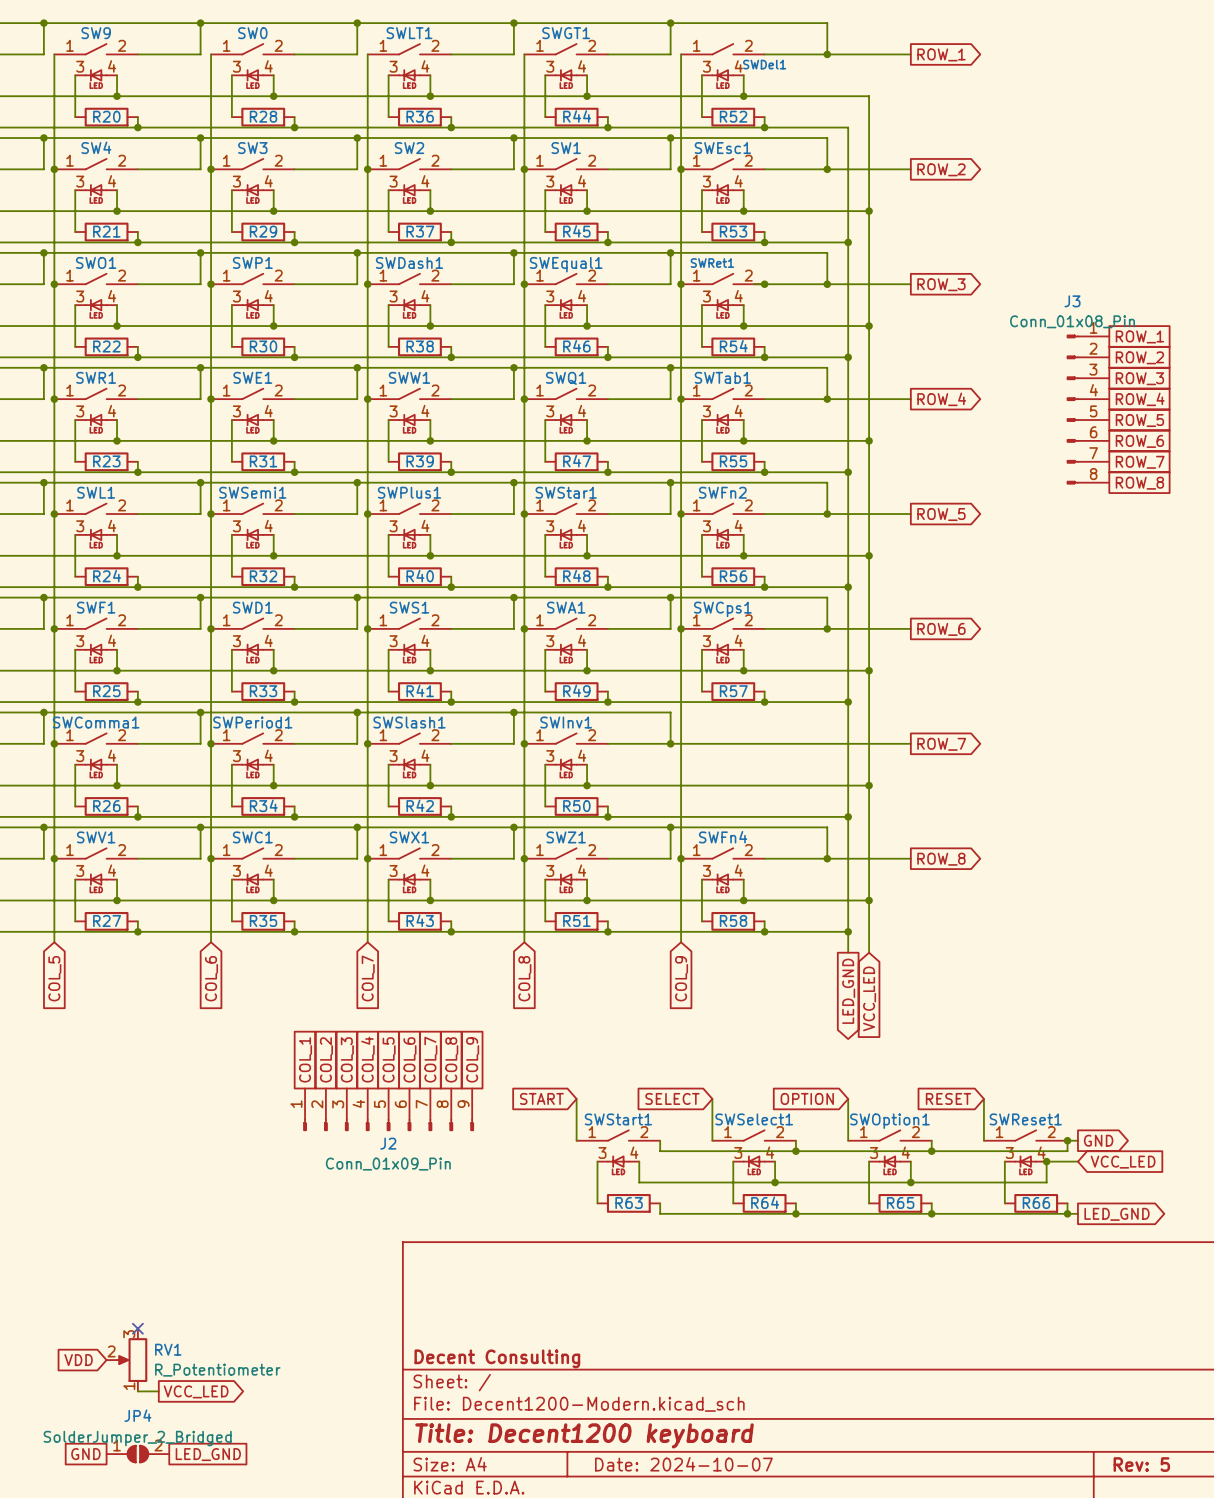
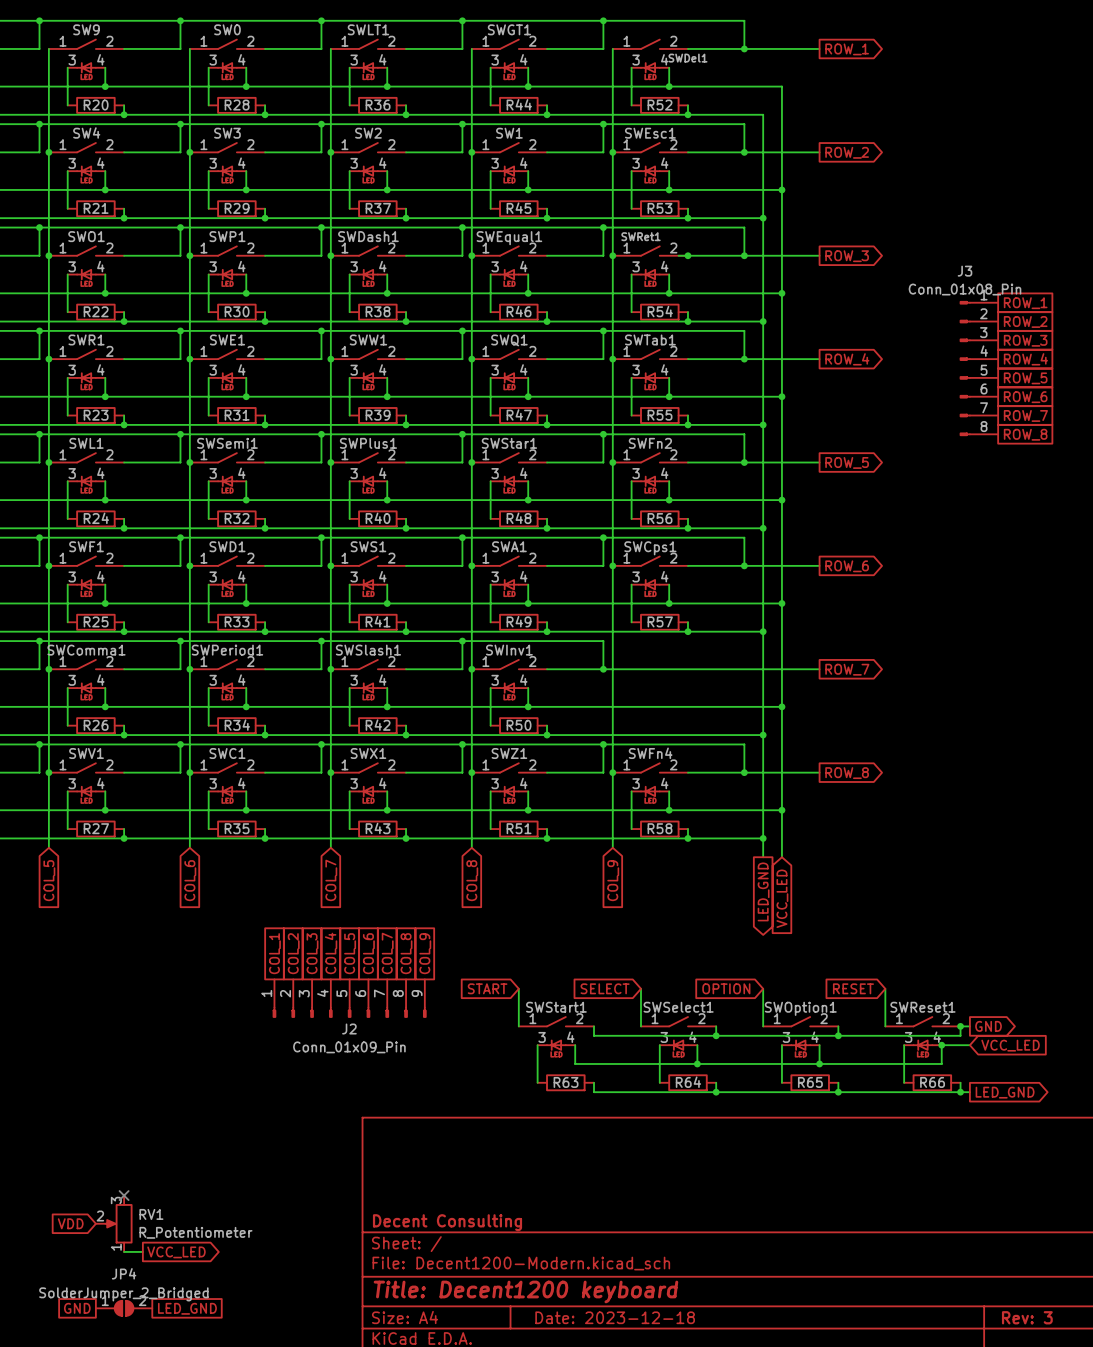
title block: Date: 2024-10-07 (683, 1464) -> Date: 2023-12-18 (615, 1317)
title block: Rev: 5 (1141, 1464) -> Rev: 3 (1027, 1317)

